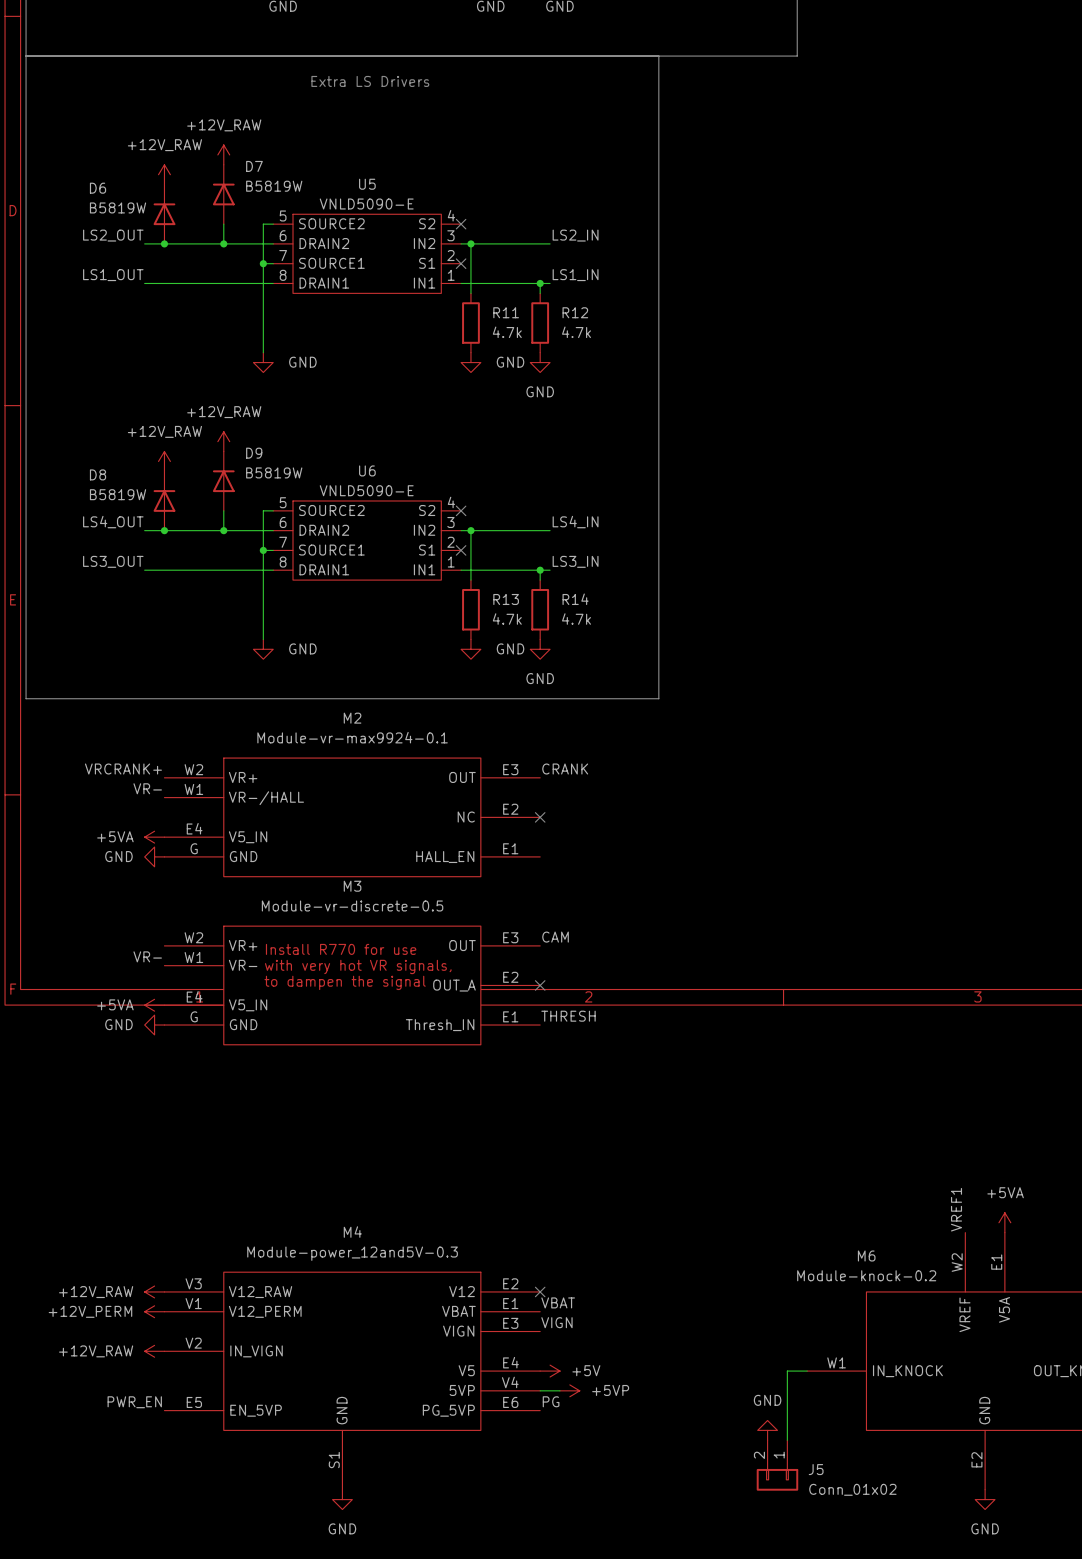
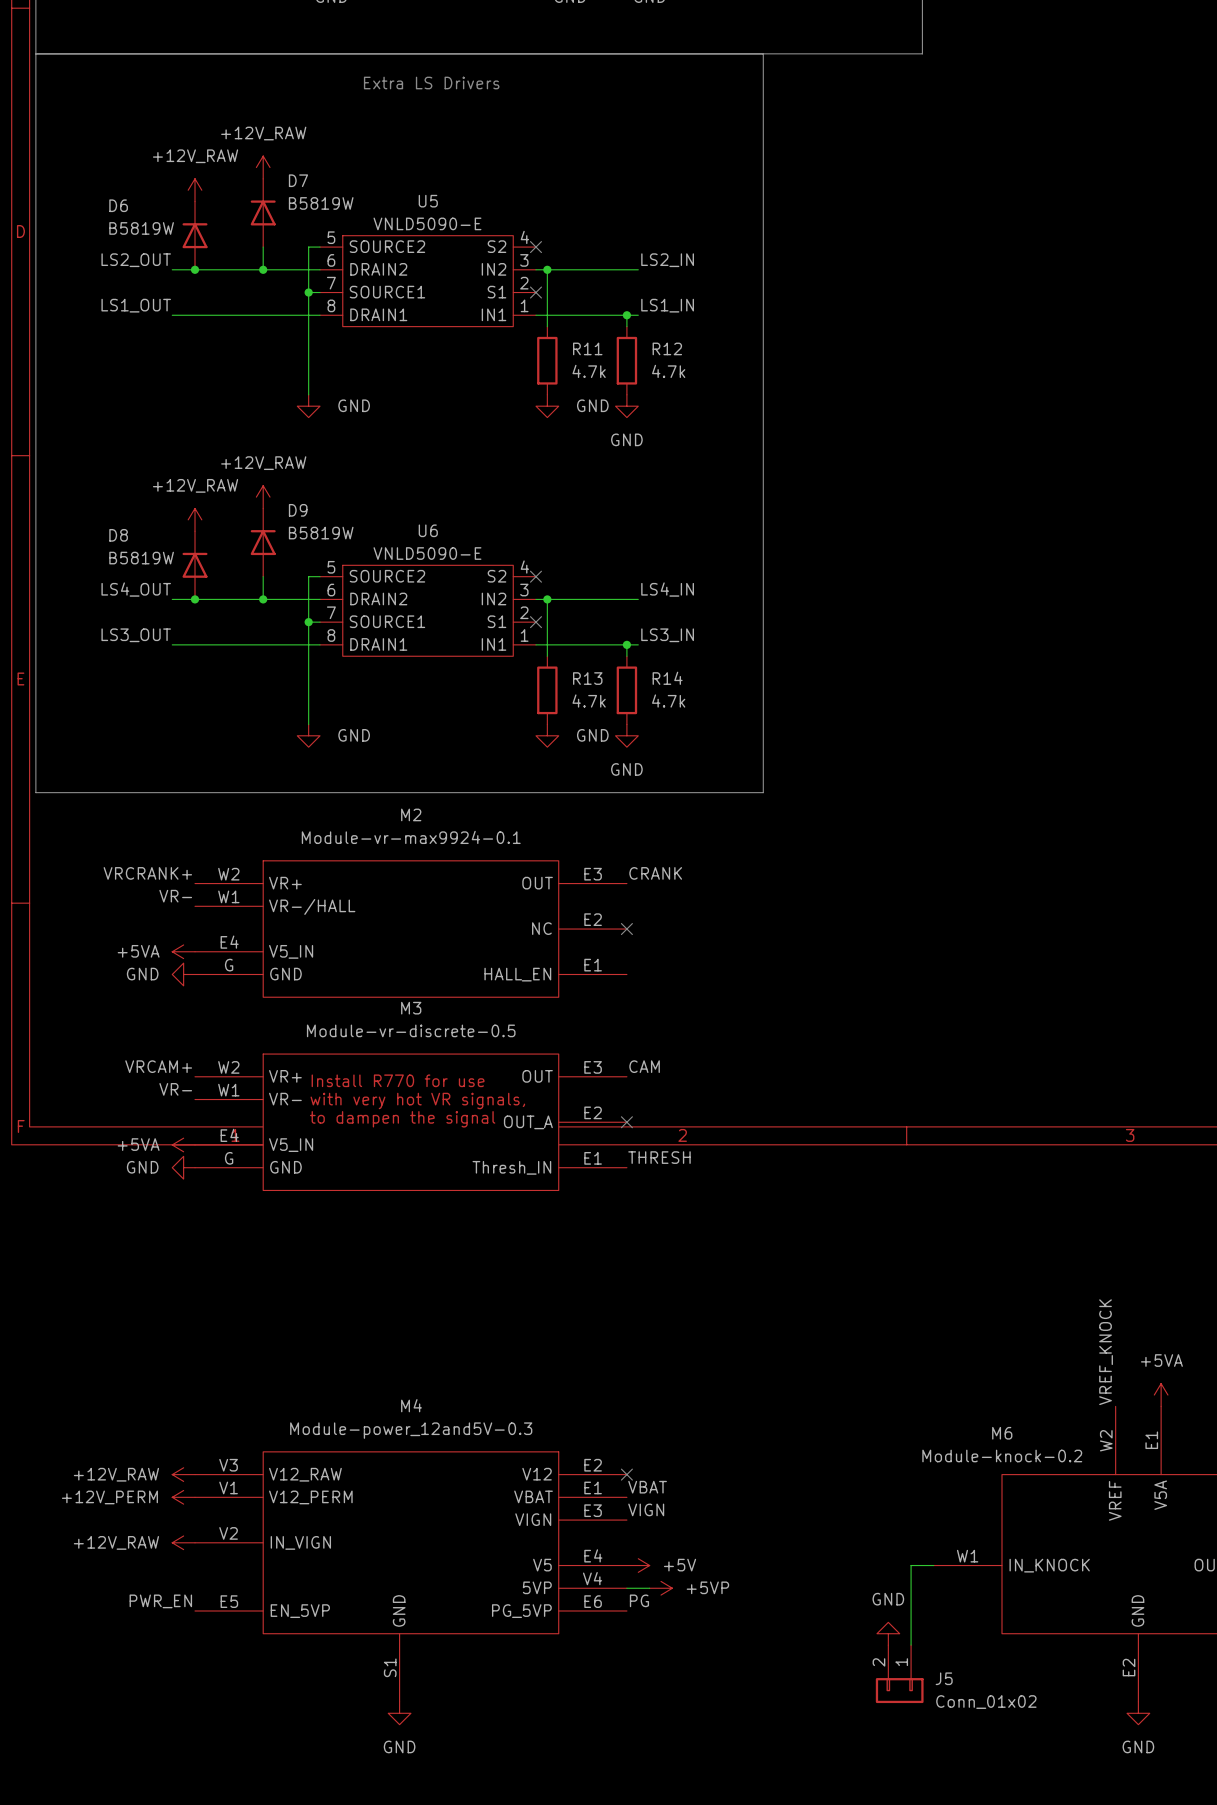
label: none -> VRCAM+ (158, 1066)
label: VREF1 (956, 1209) -> VREF_KNOCK (1106, 1352)

